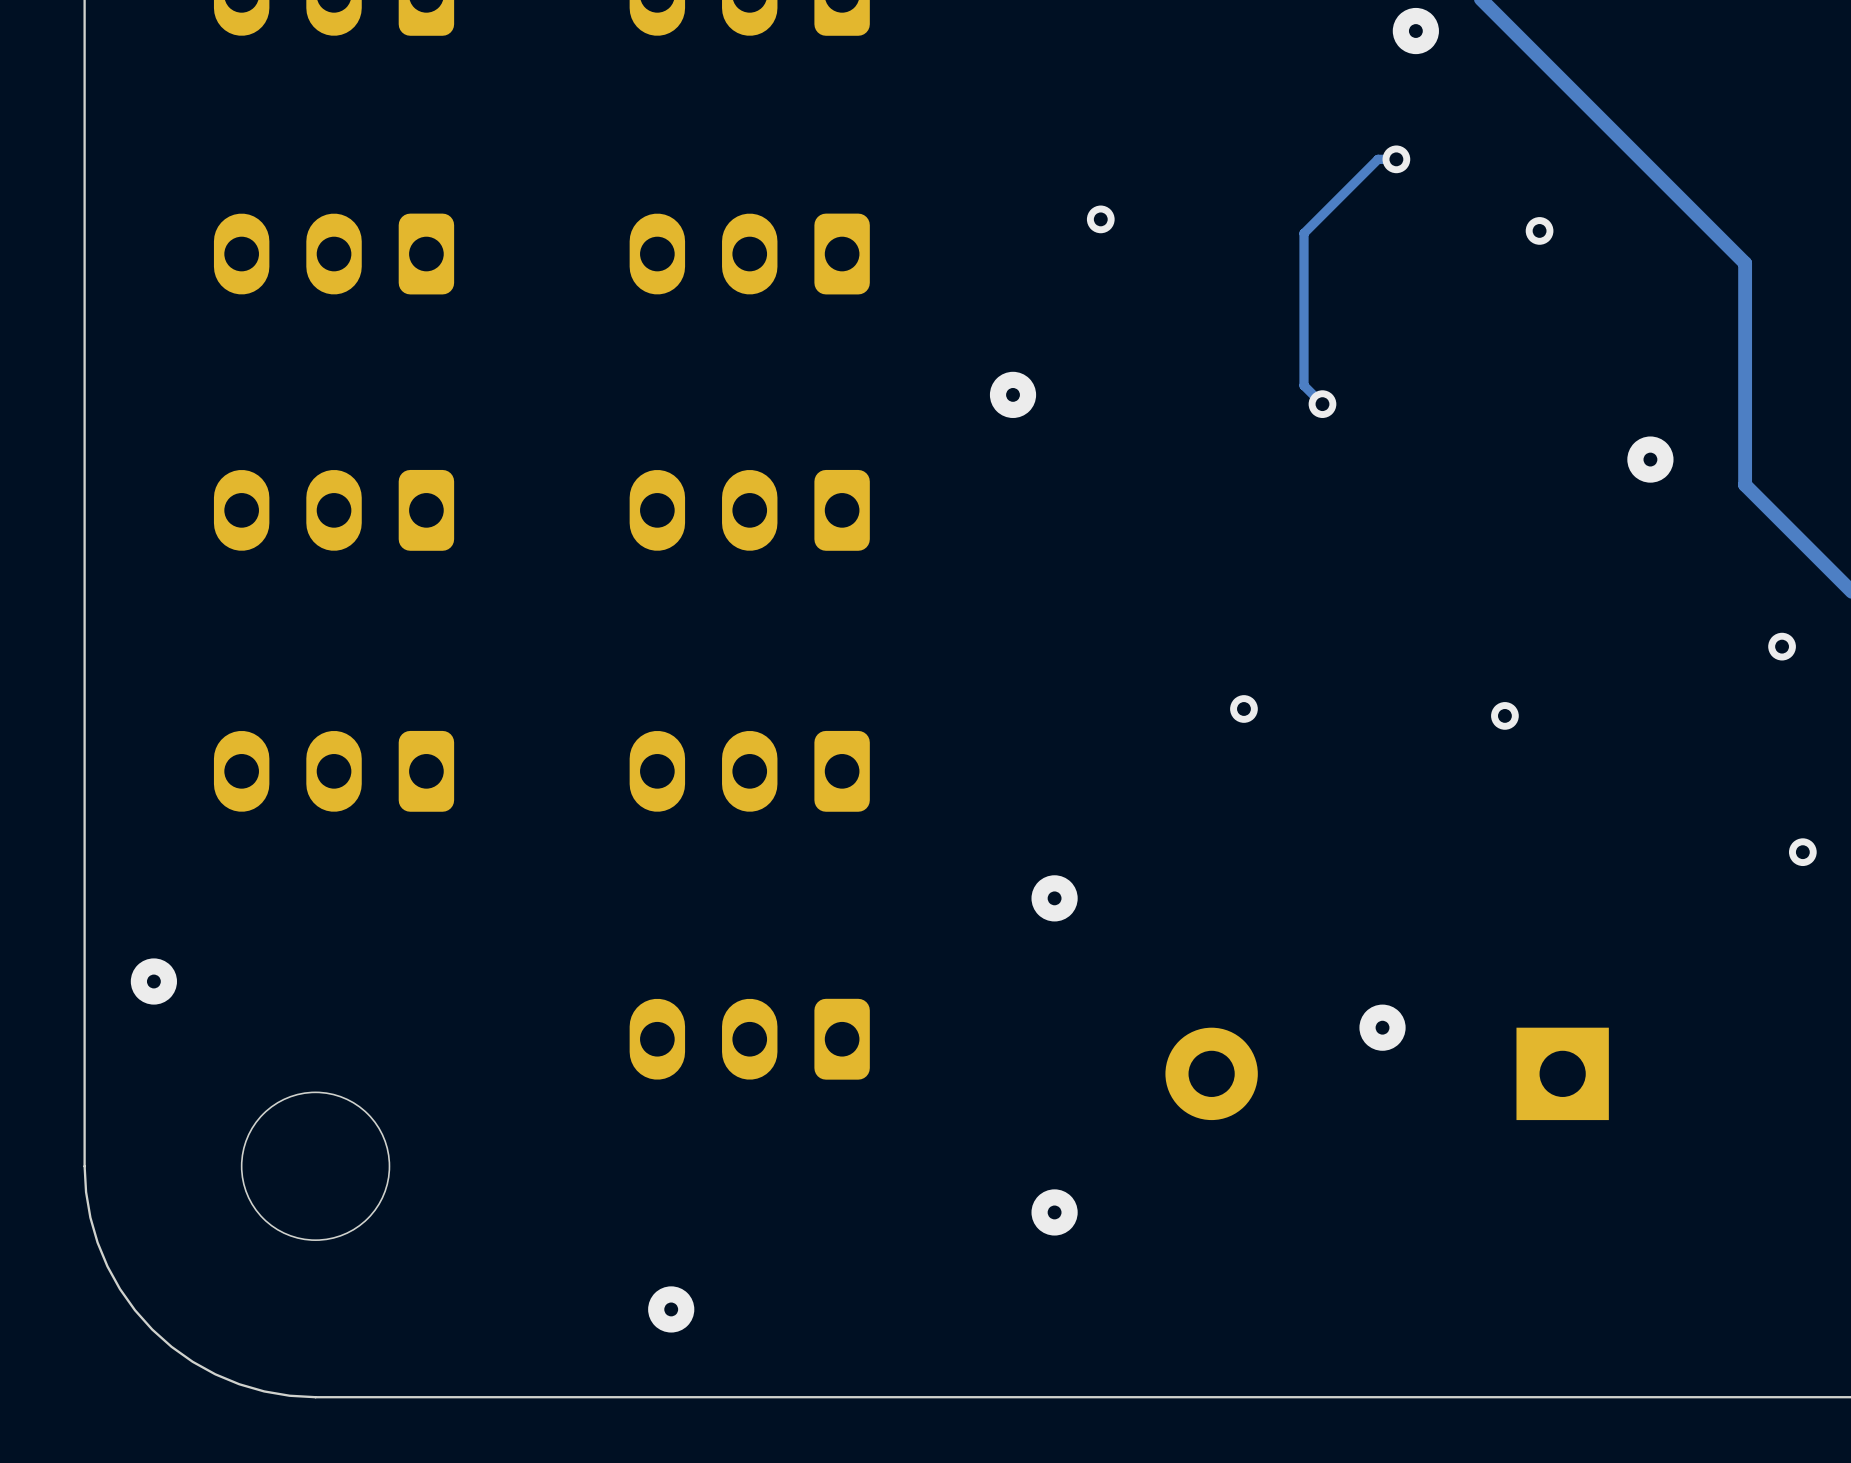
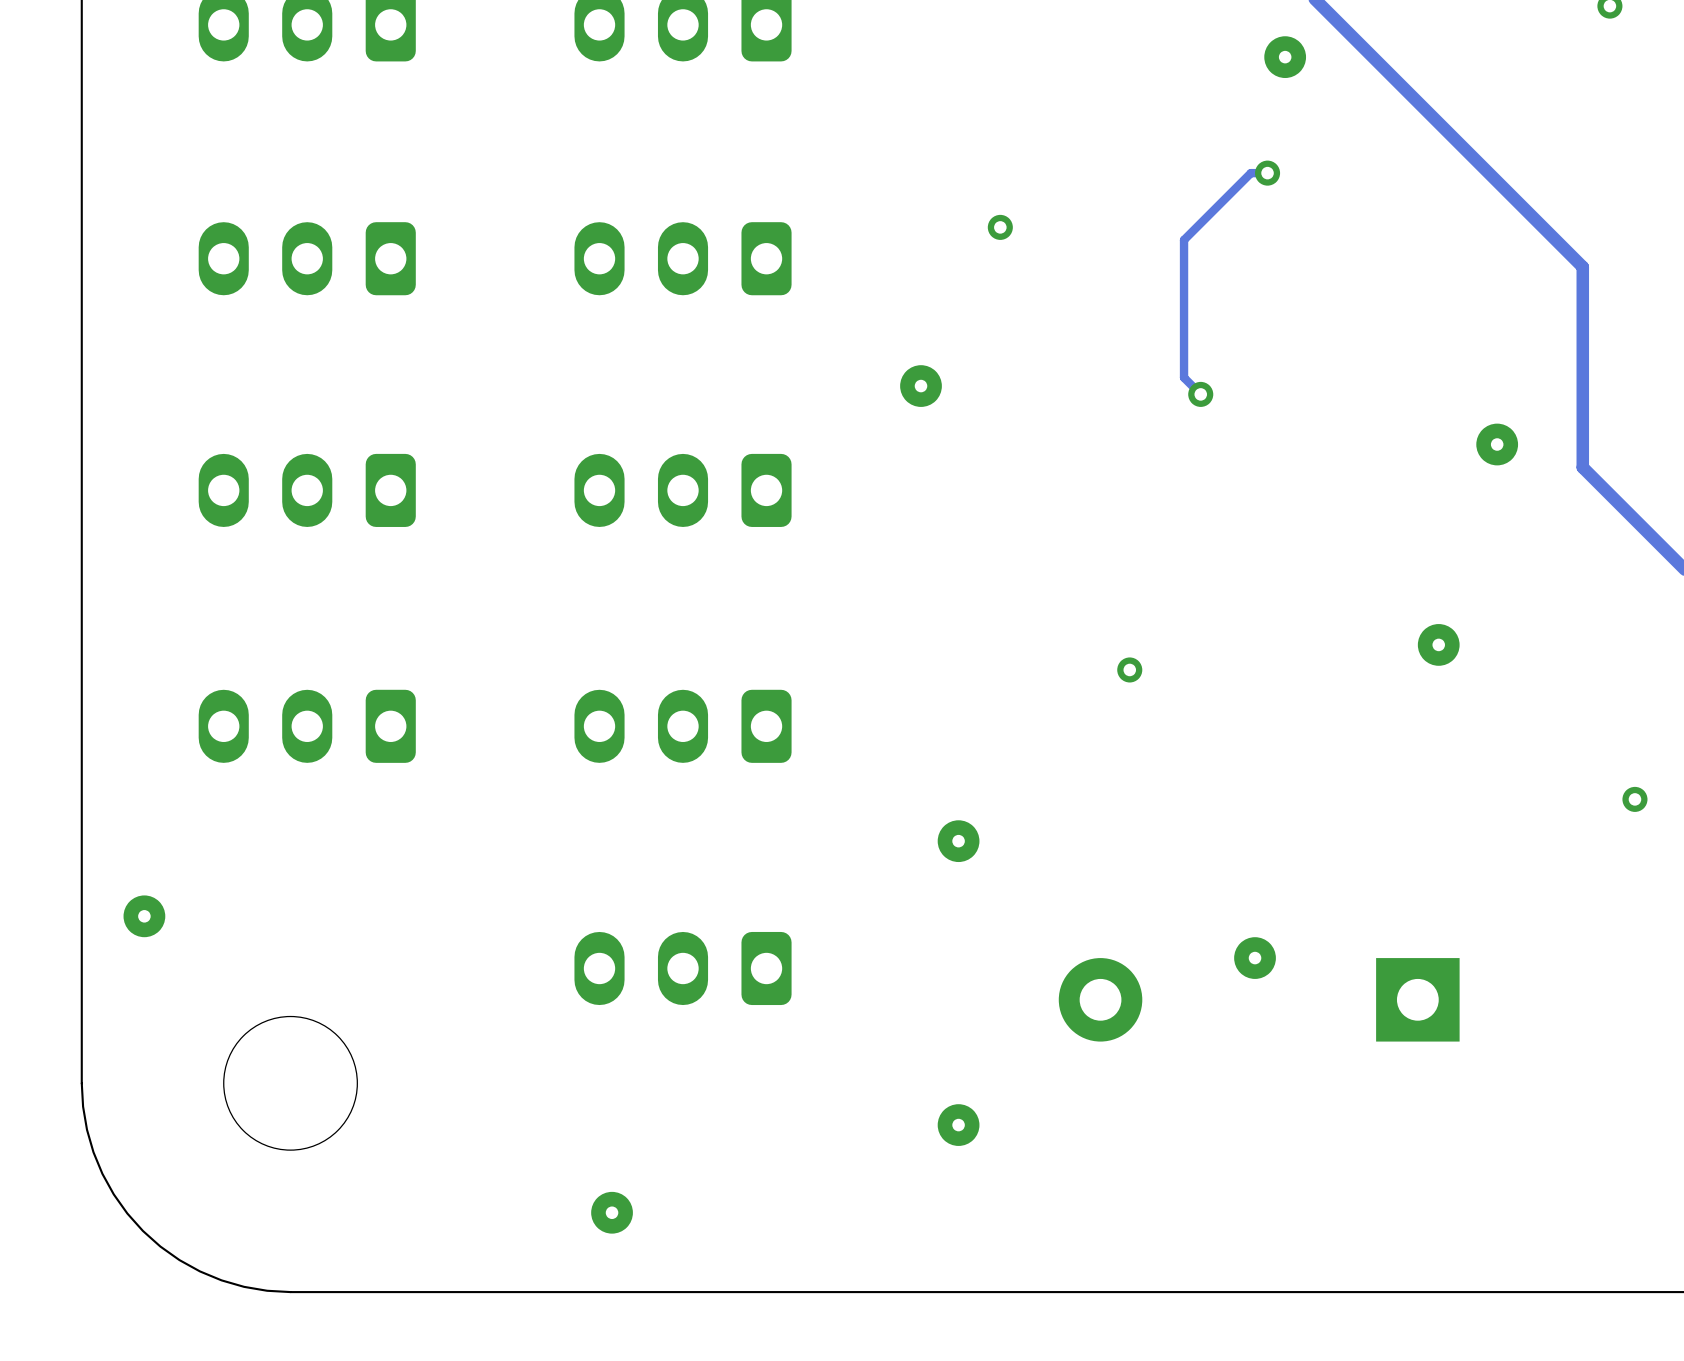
via: (1539, 230) -> none
via: (1782, 646) -> none
via: none -> (1438, 644)
via: (1504, 715) -> none

